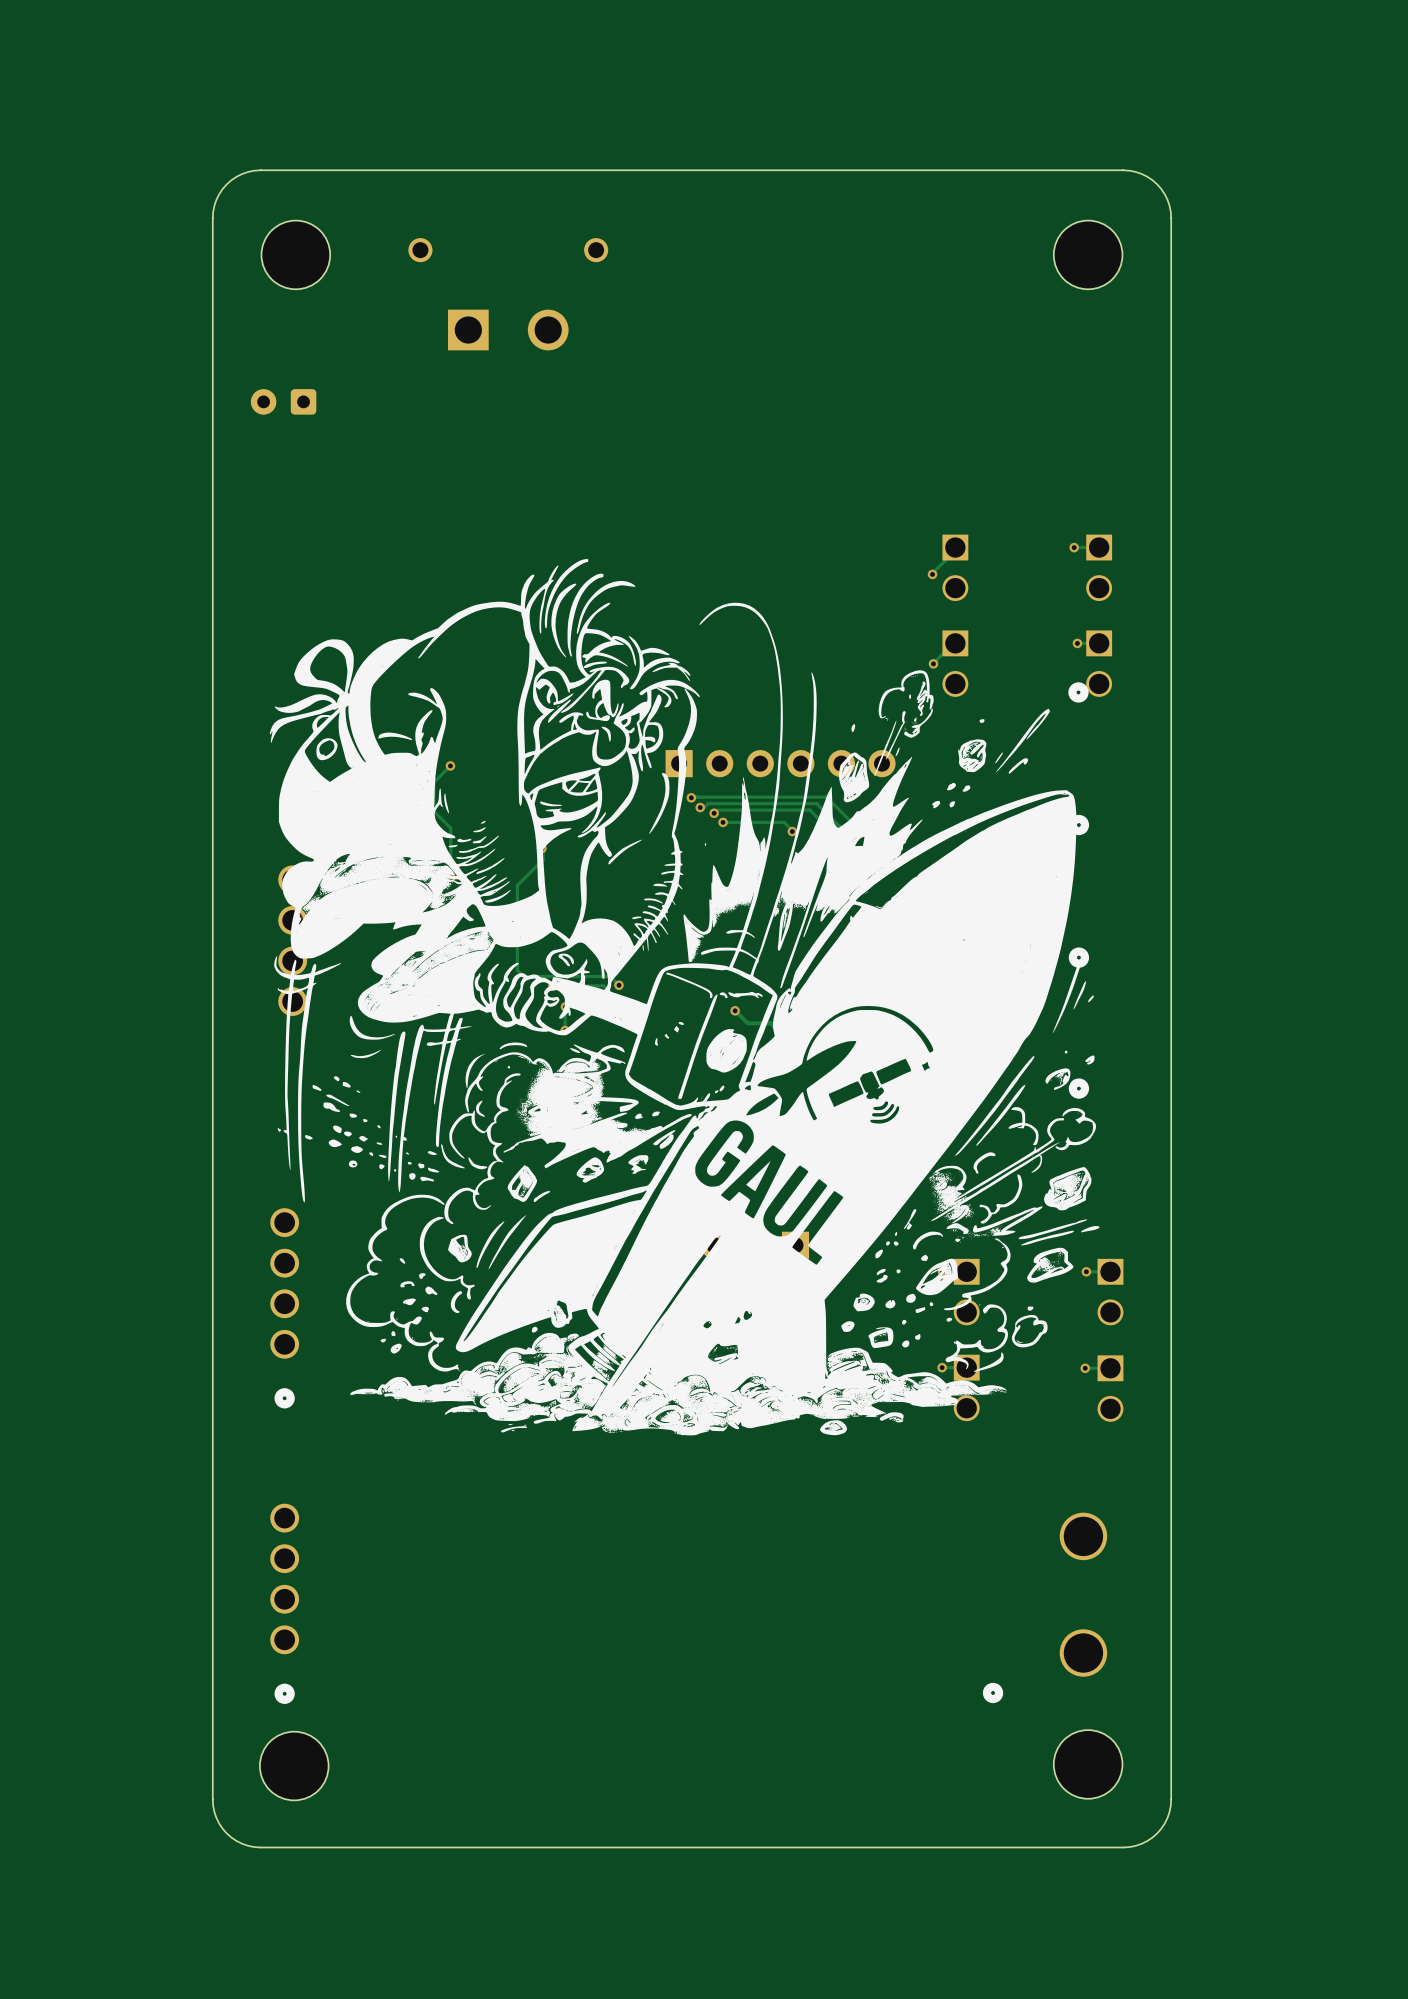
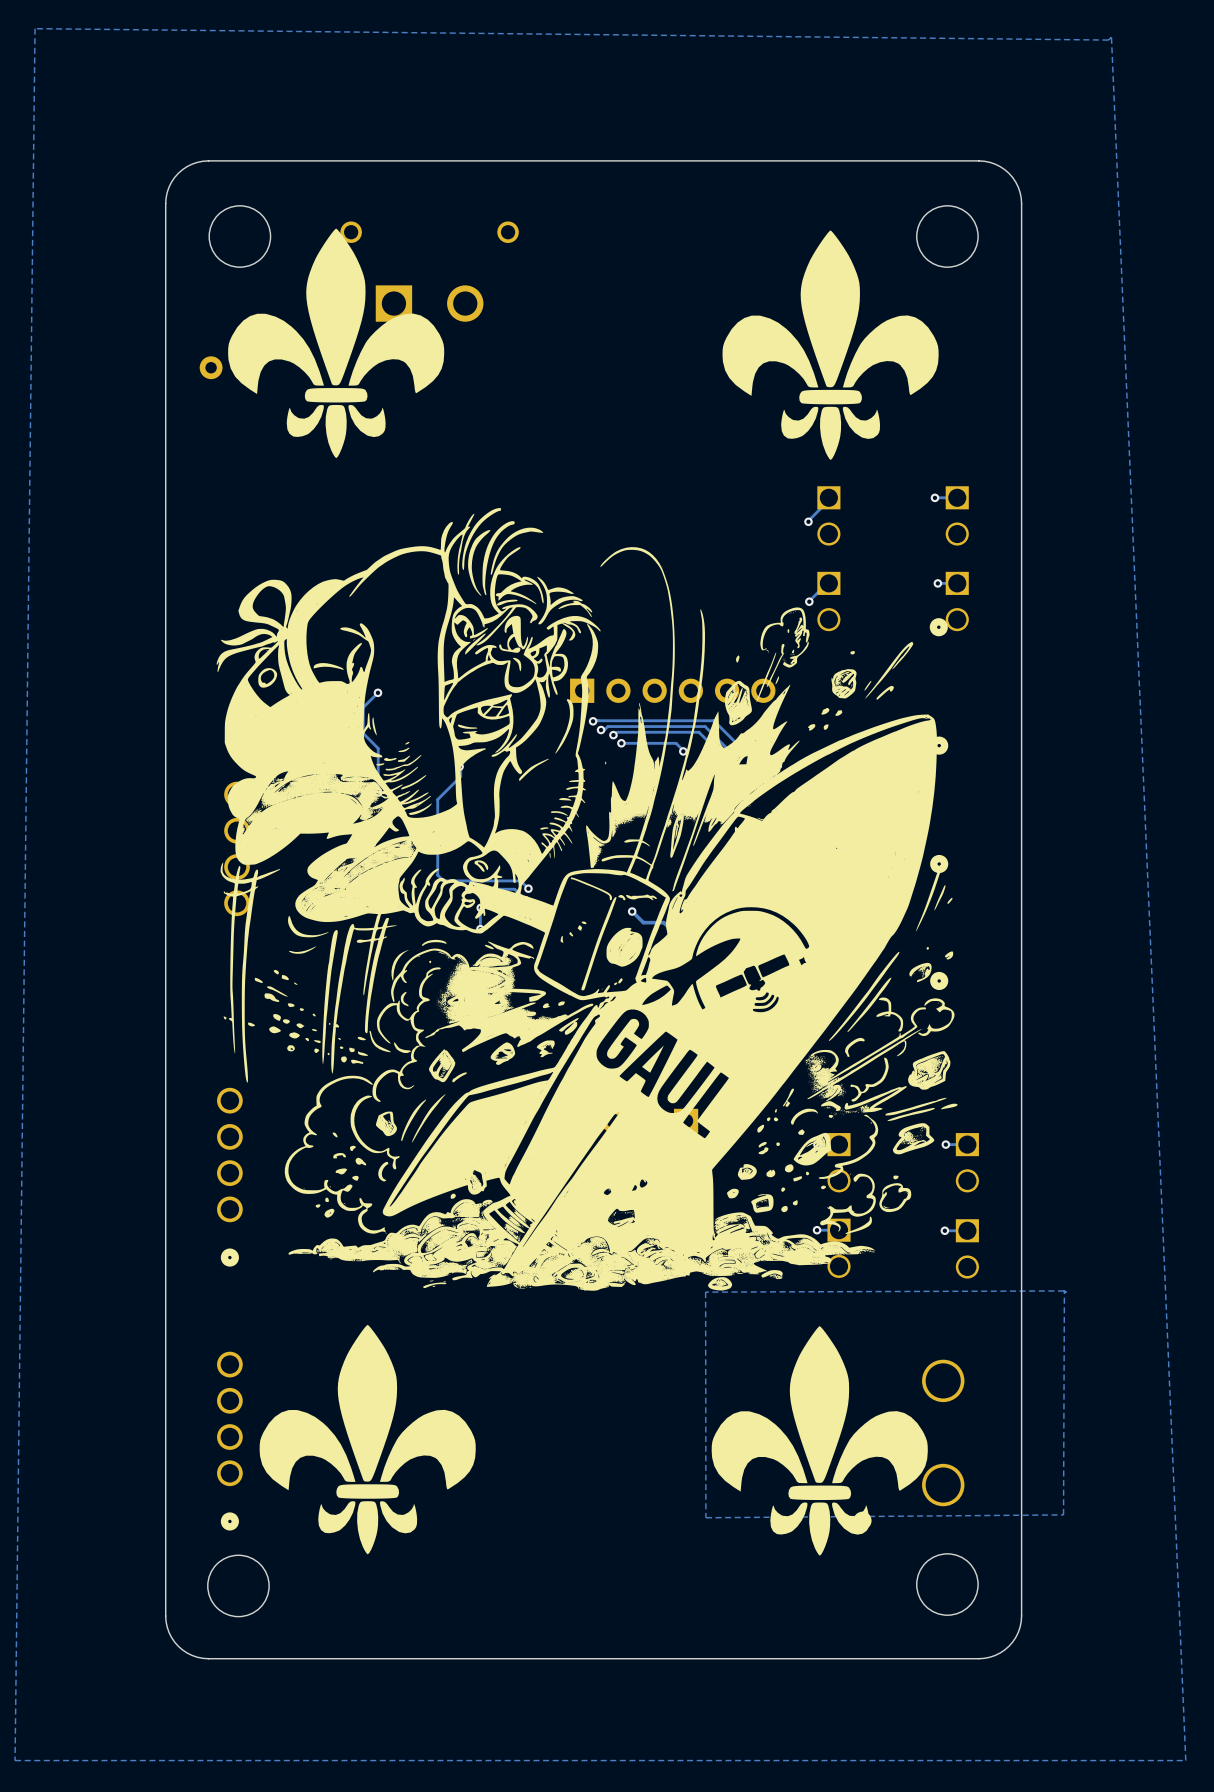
zone outline: none -> (35, 28) (1108, 40) (1111, 37) (1185, 1760) (15, 1760) (35, 28)
drawing: none -> [228, 228, 445, 459]
drawing: none -> [722, 230, 939, 460]
zone outline: none -> (1064, 1290) (1063, 1514) (705, 1517) (705, 1292) (1063, 1290) (1066, 1292) (1064, 1290)
drawing: none -> [259, 1324, 476, 1555]
drawing: none -> [711, 1326, 928, 1556]

